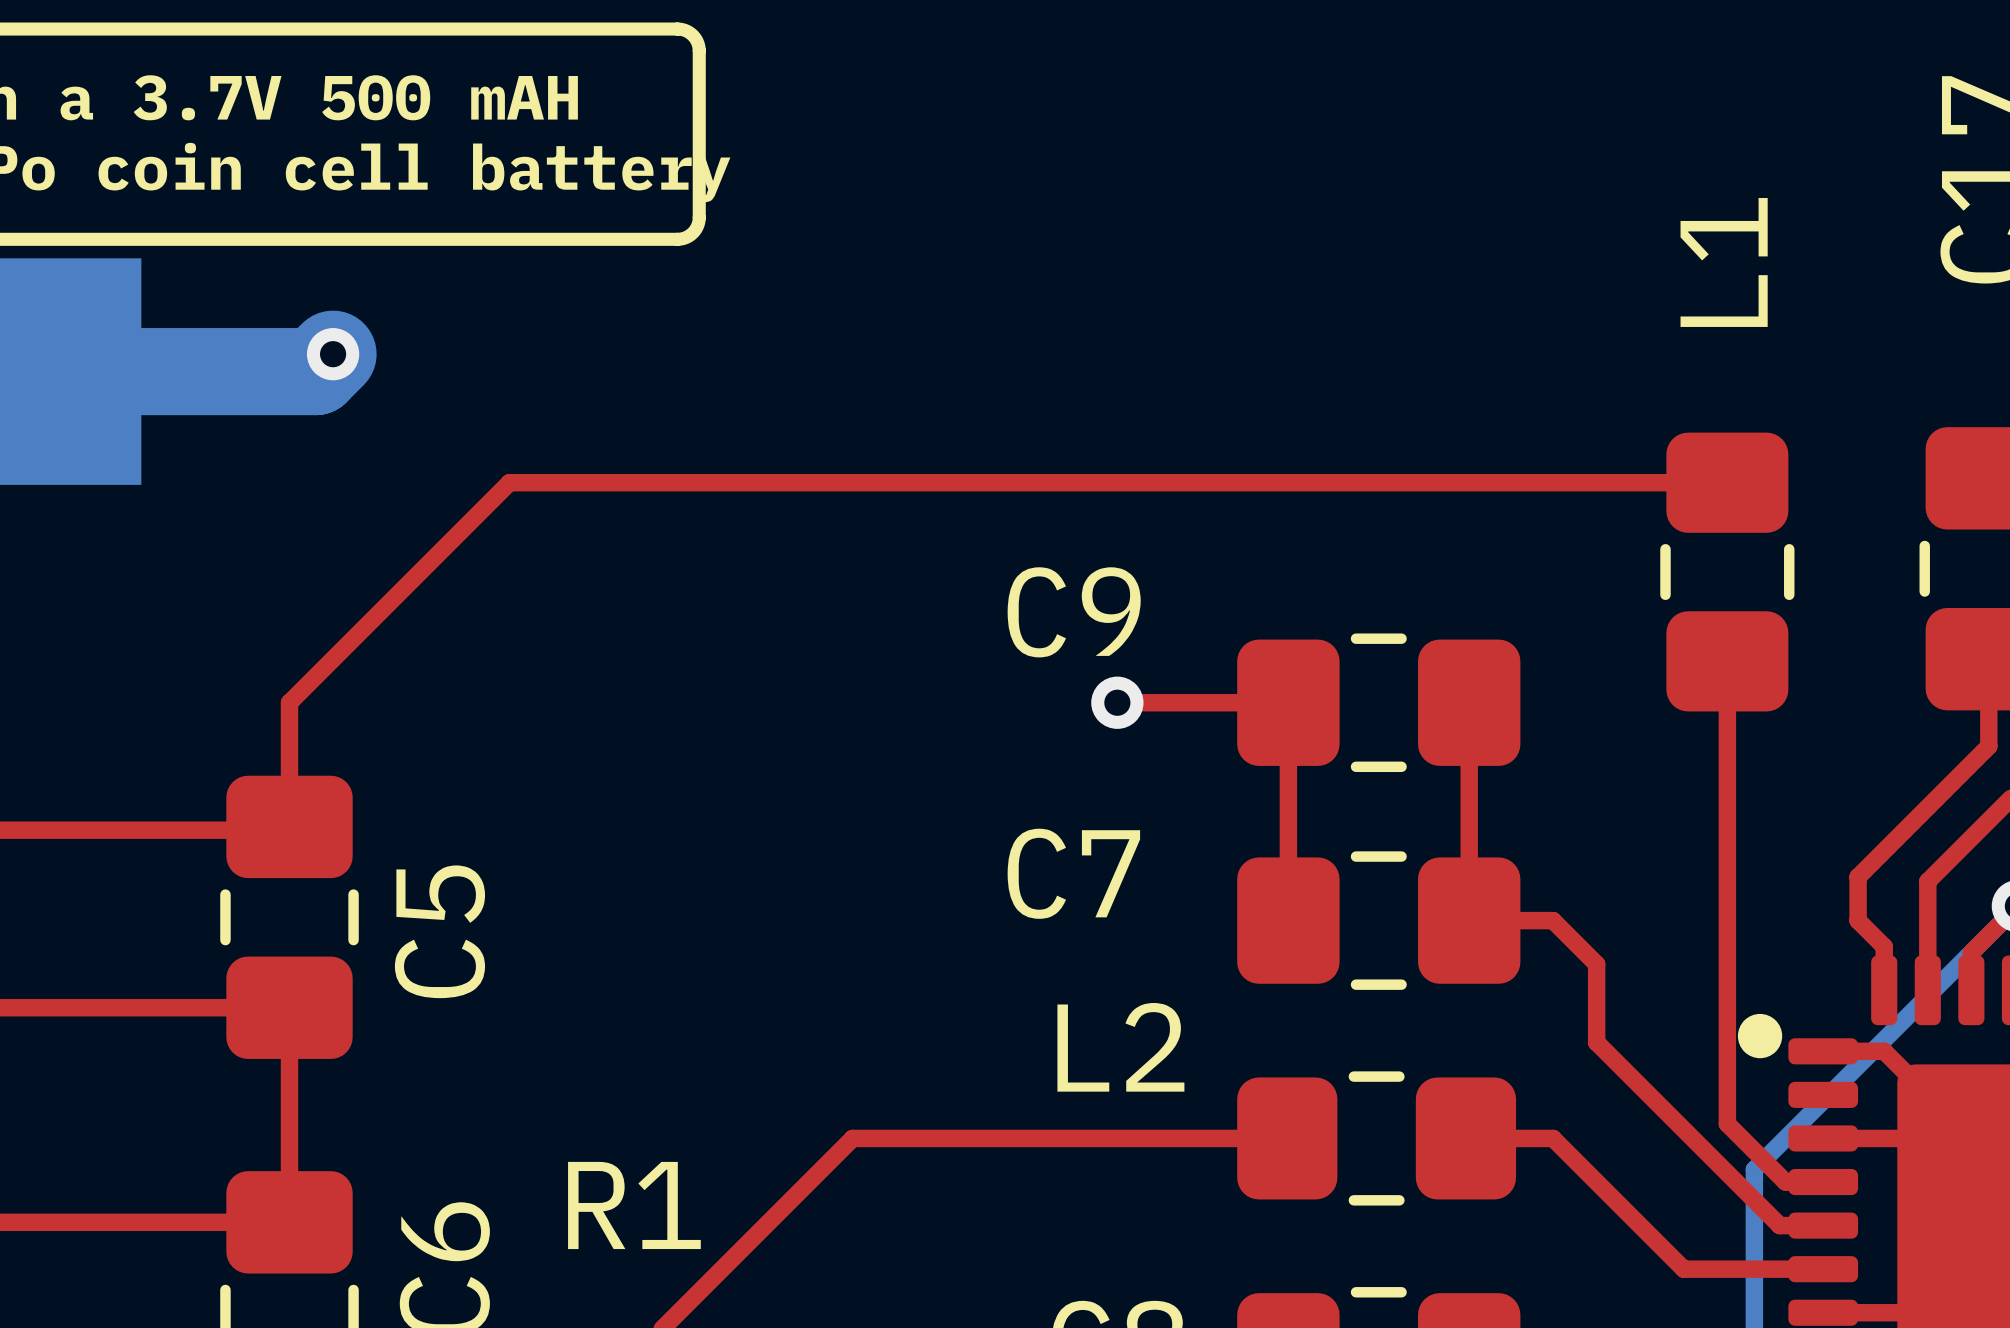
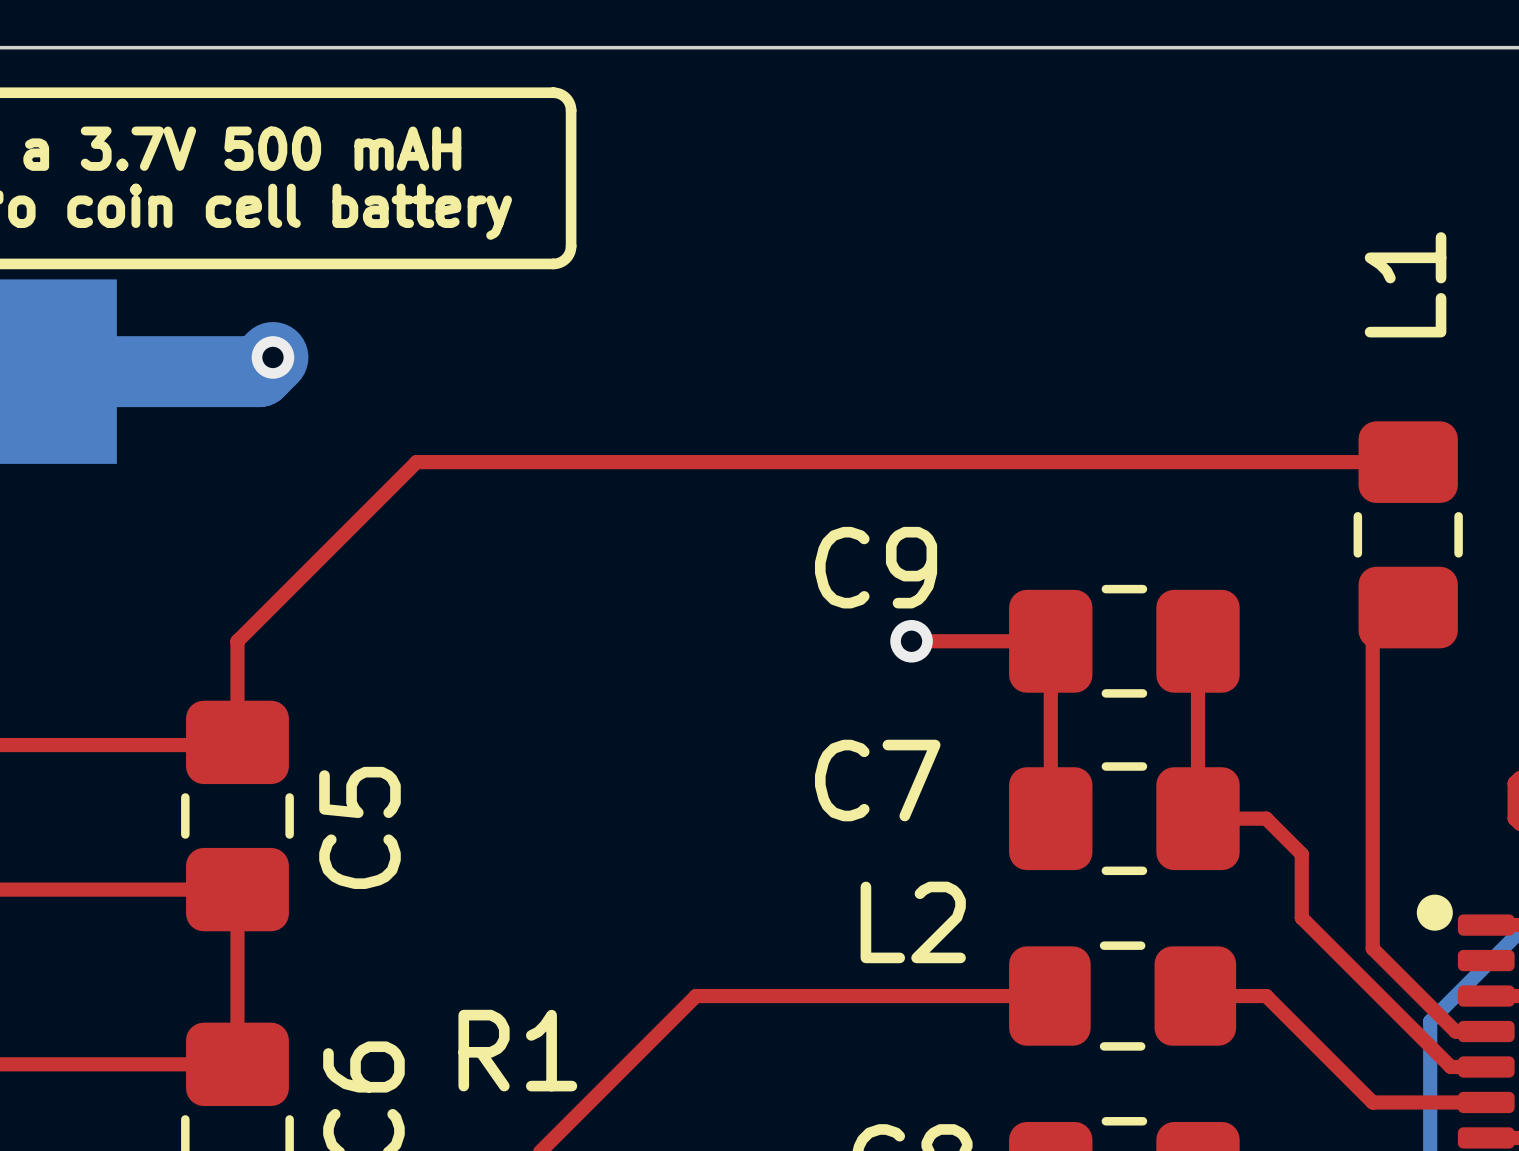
top track: (1727, 661) (1727, 1123) -> (1408, 607) (1372, 643) (1372, 948) (1408, 984)

